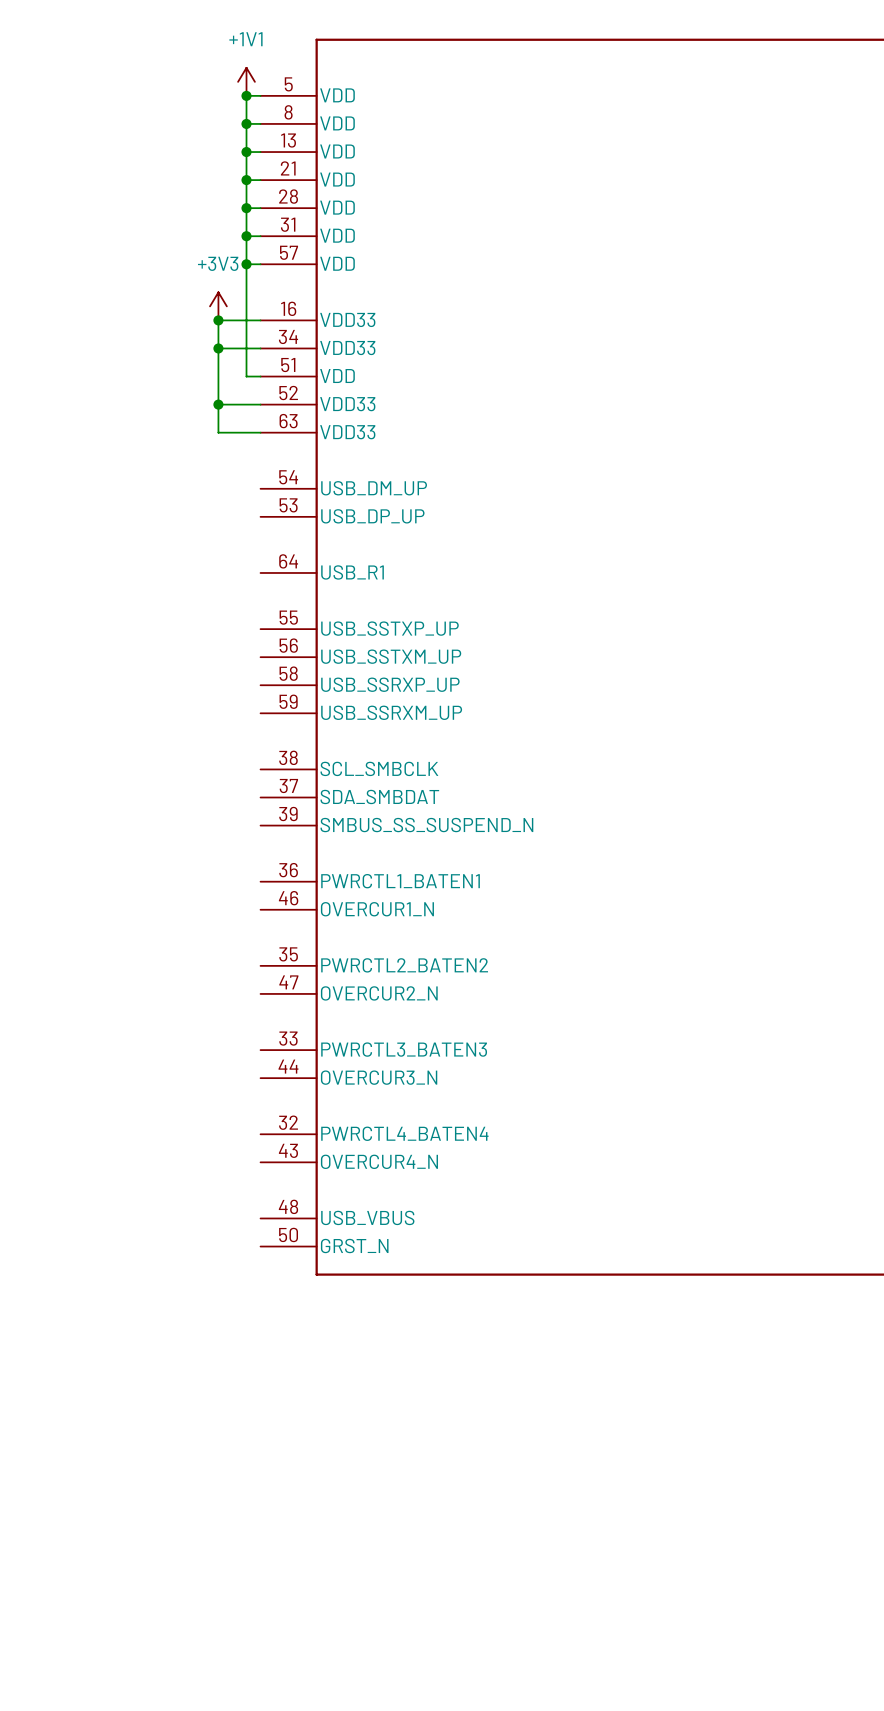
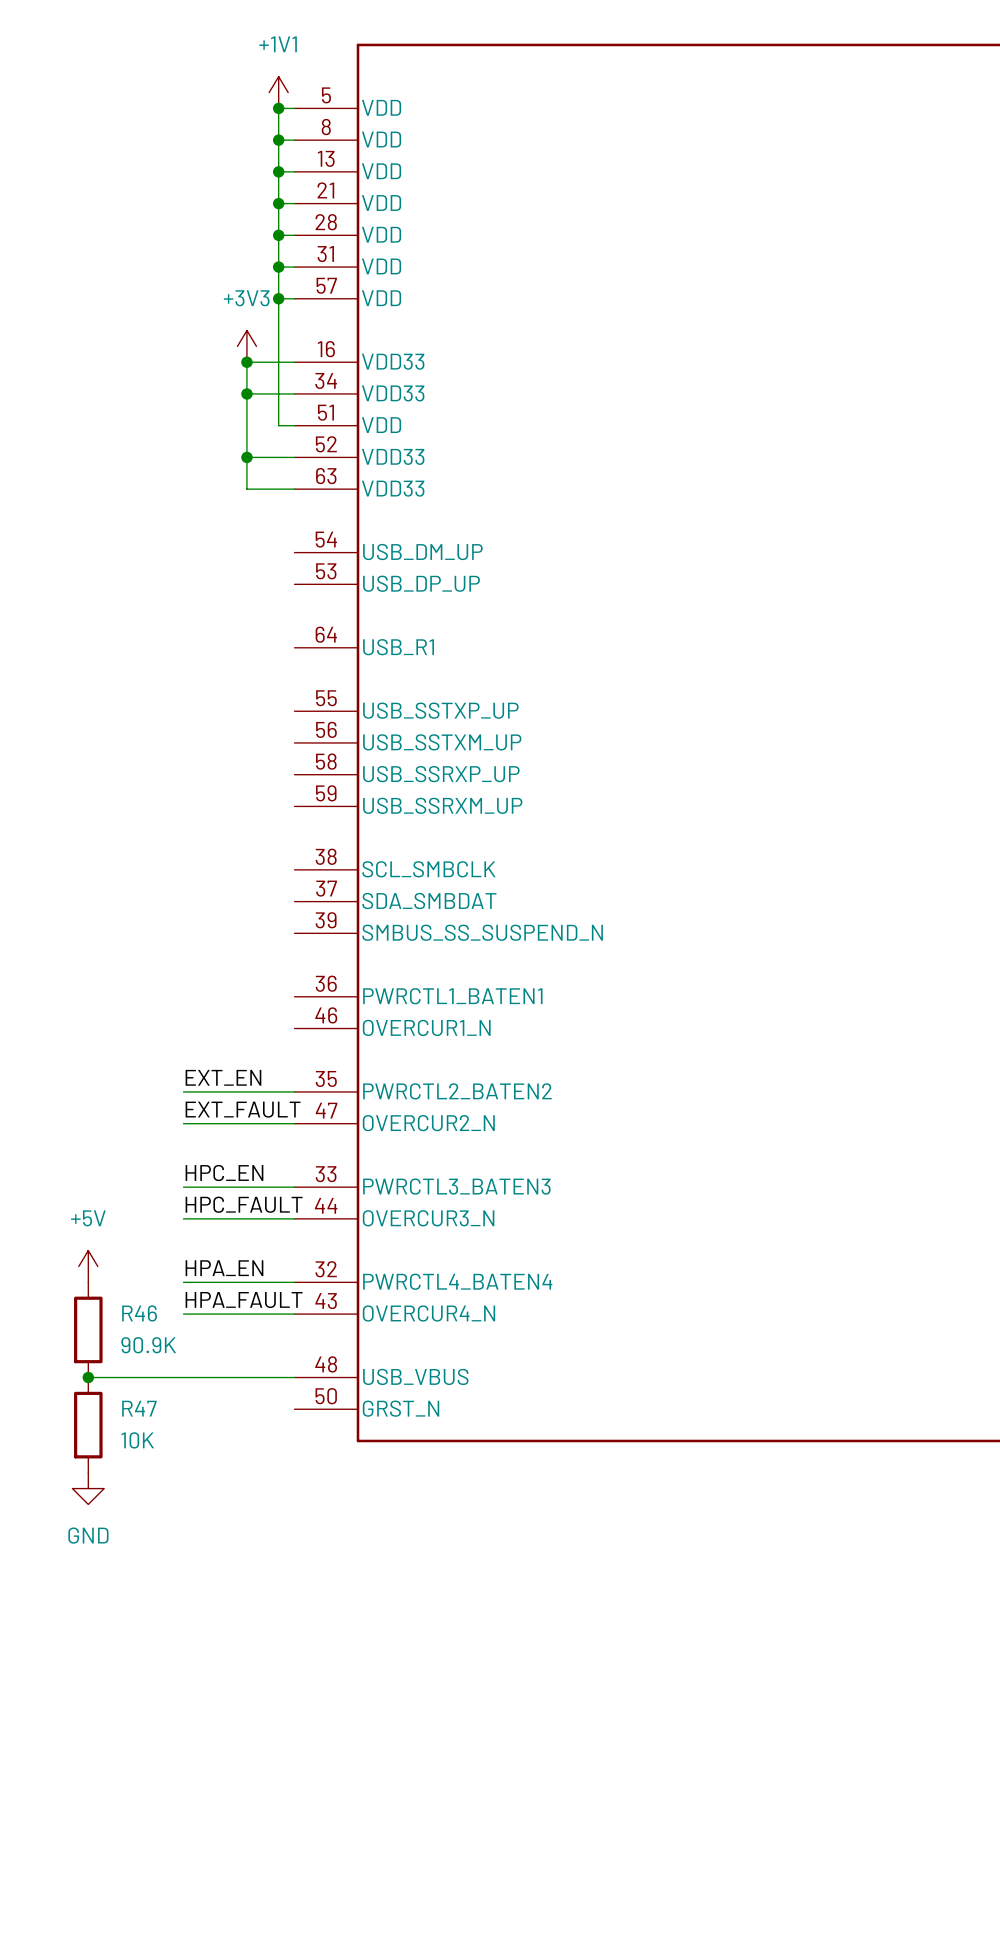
label: none -> EXT_EN (223, 1077)
wire: none -> (183, 1091) (294, 1091)
label: none -> EXT_FAULT (243, 1109)
wire: none -> (183, 1123) (294, 1123)
label: none -> HPC_EN (224, 1173)
wire: none -> (183, 1187) (294, 1187)
label: none -> HPC_FAULT (244, 1204)
wire: none -> (183, 1218) (294, 1218)
power symbol: none -> +5V (88, 1266)
label: none -> HPA_EN (224, 1268)
wire: none -> (183, 1282) (294, 1282)
label: none -> HPA_FAULT (244, 1299)
wire: none -> (183, 1314) (294, 1314)
R46: none -> 90.9K (88, 1329)
wire: none -> (88, 1377) (294, 1377)
junction: none -> (88, 1377)
R47: none -> 10K (88, 1425)
power symbol: none -> GND (88, 1488)

